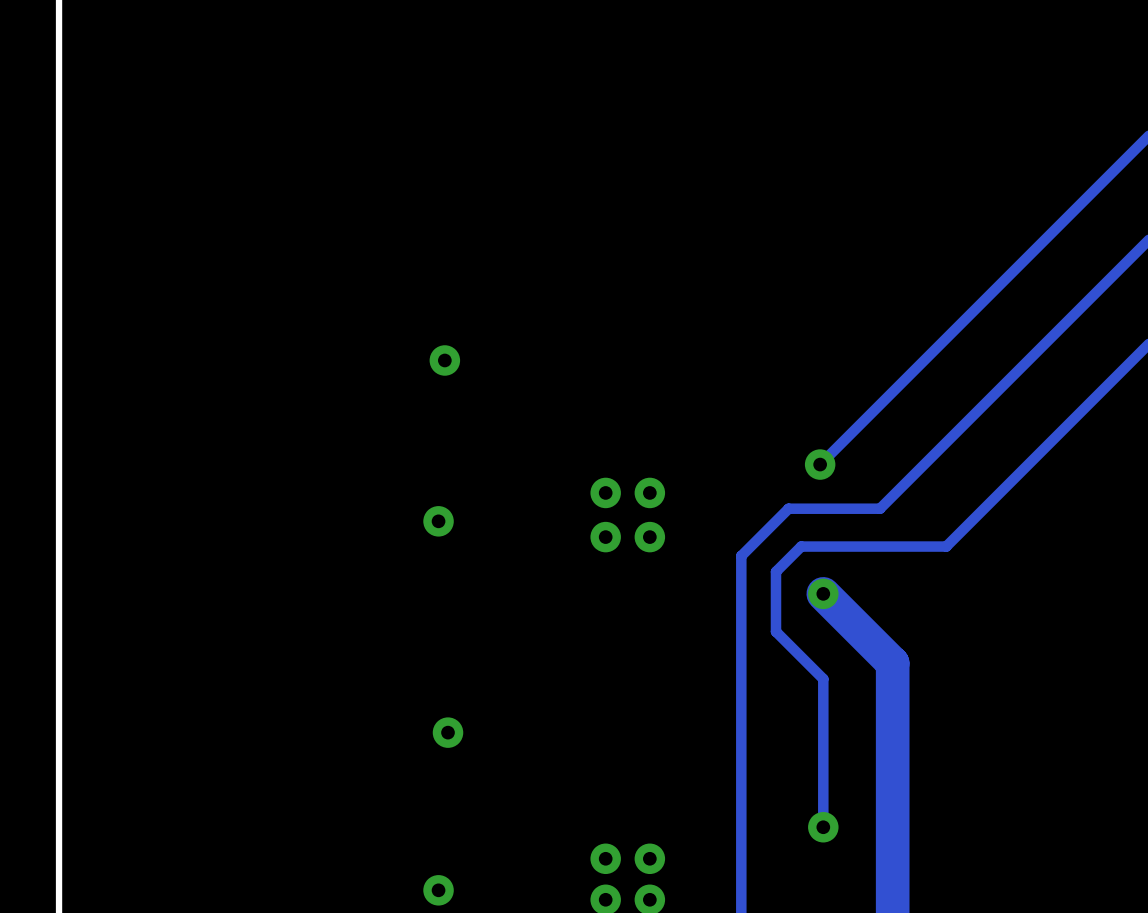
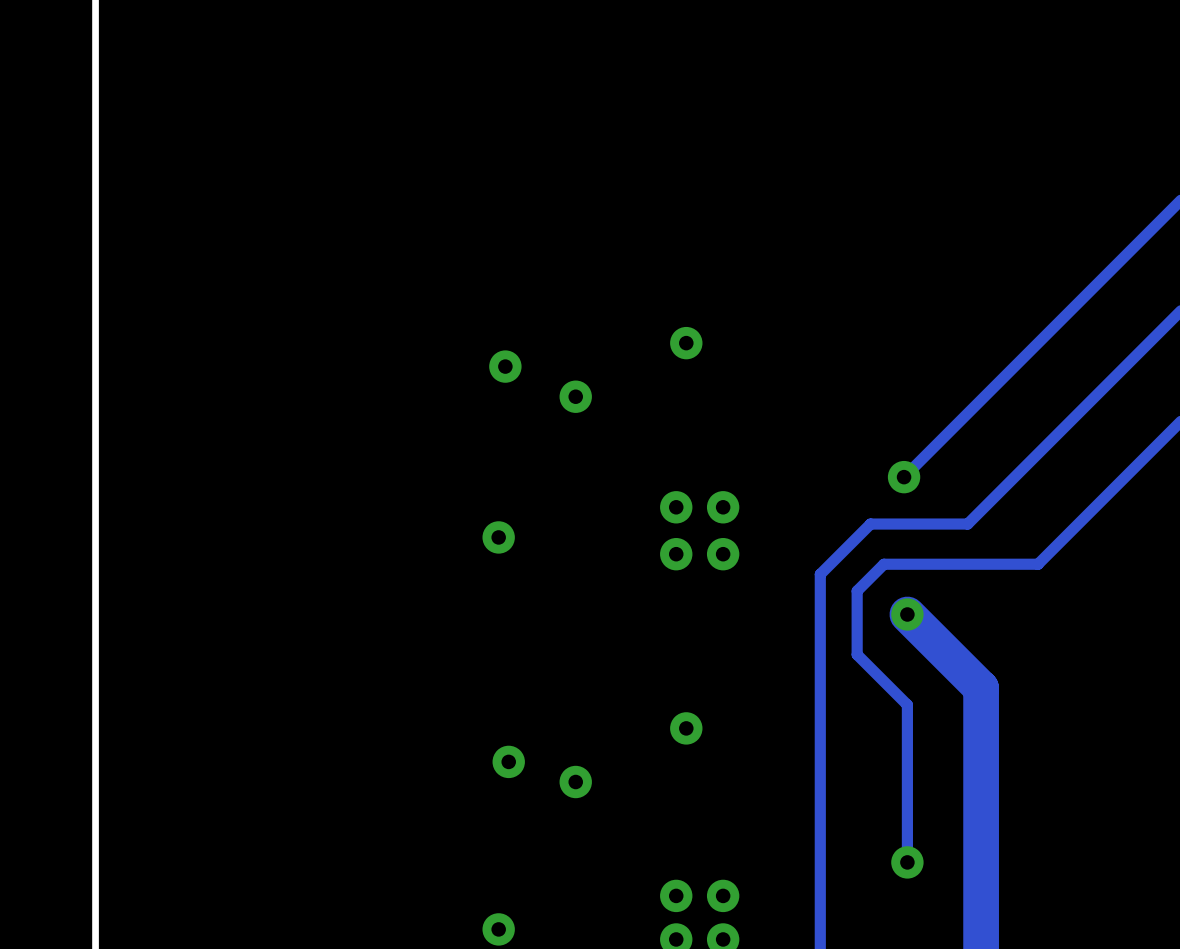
via: none -> (686, 343)
via: none -> (575, 396)
via: none -> (686, 728)
via: none -> (575, 782)

